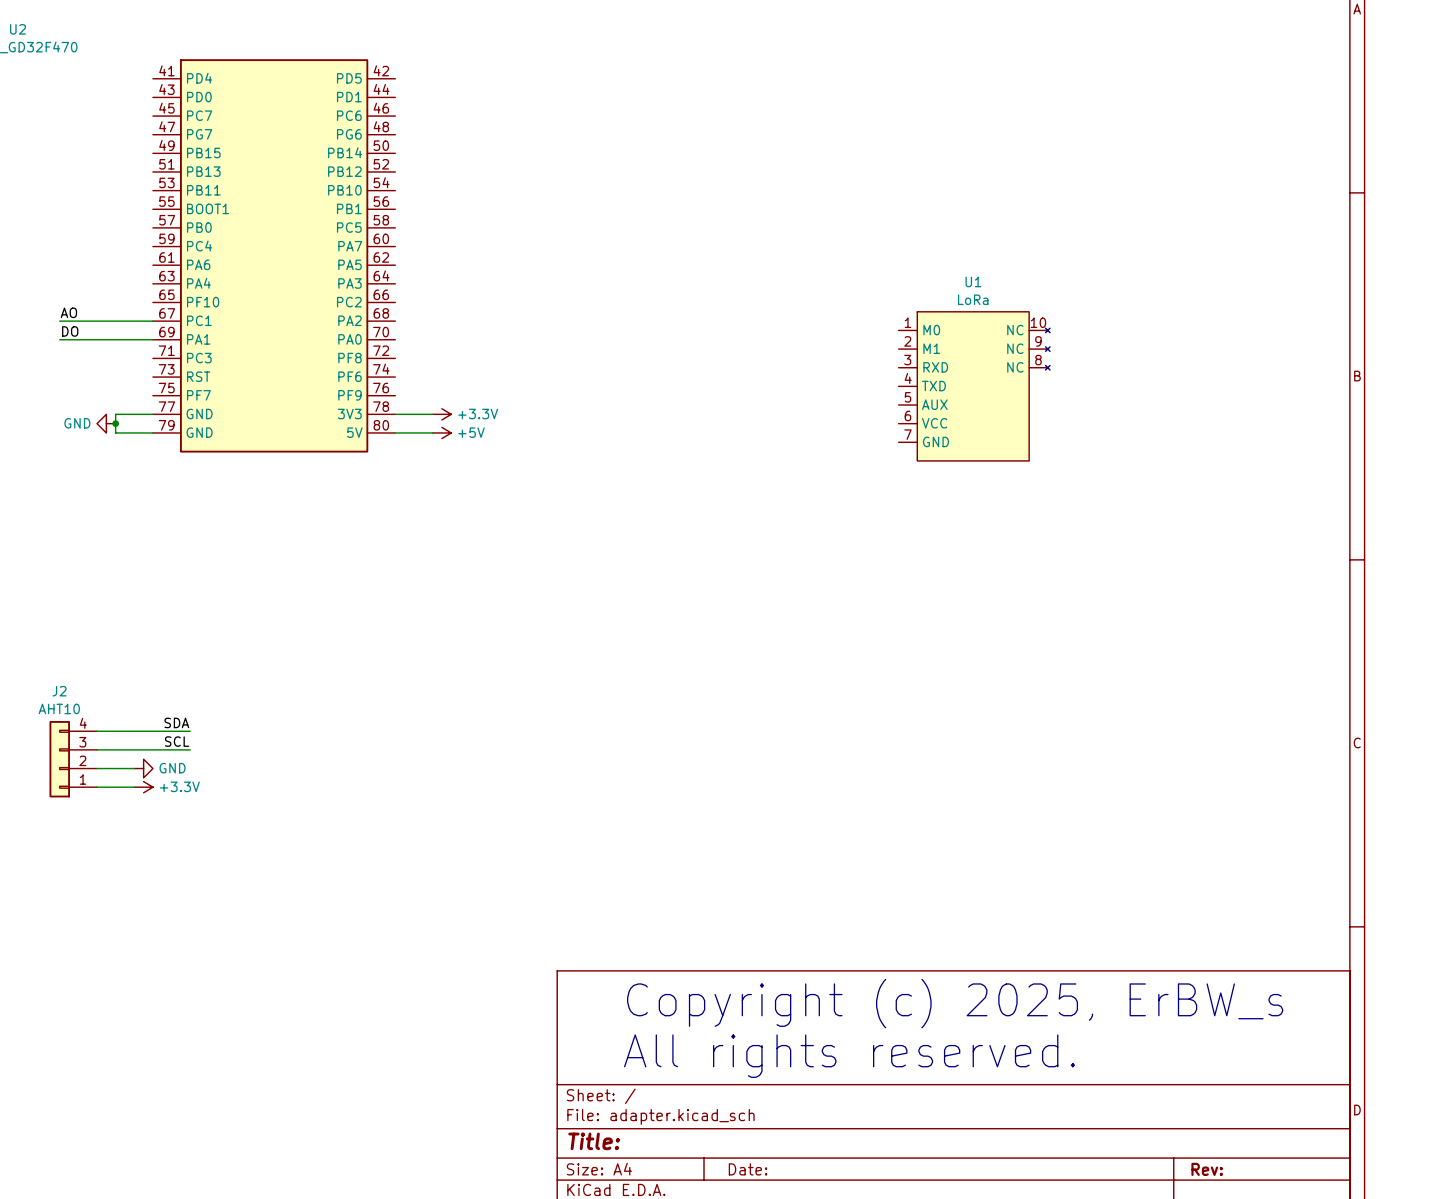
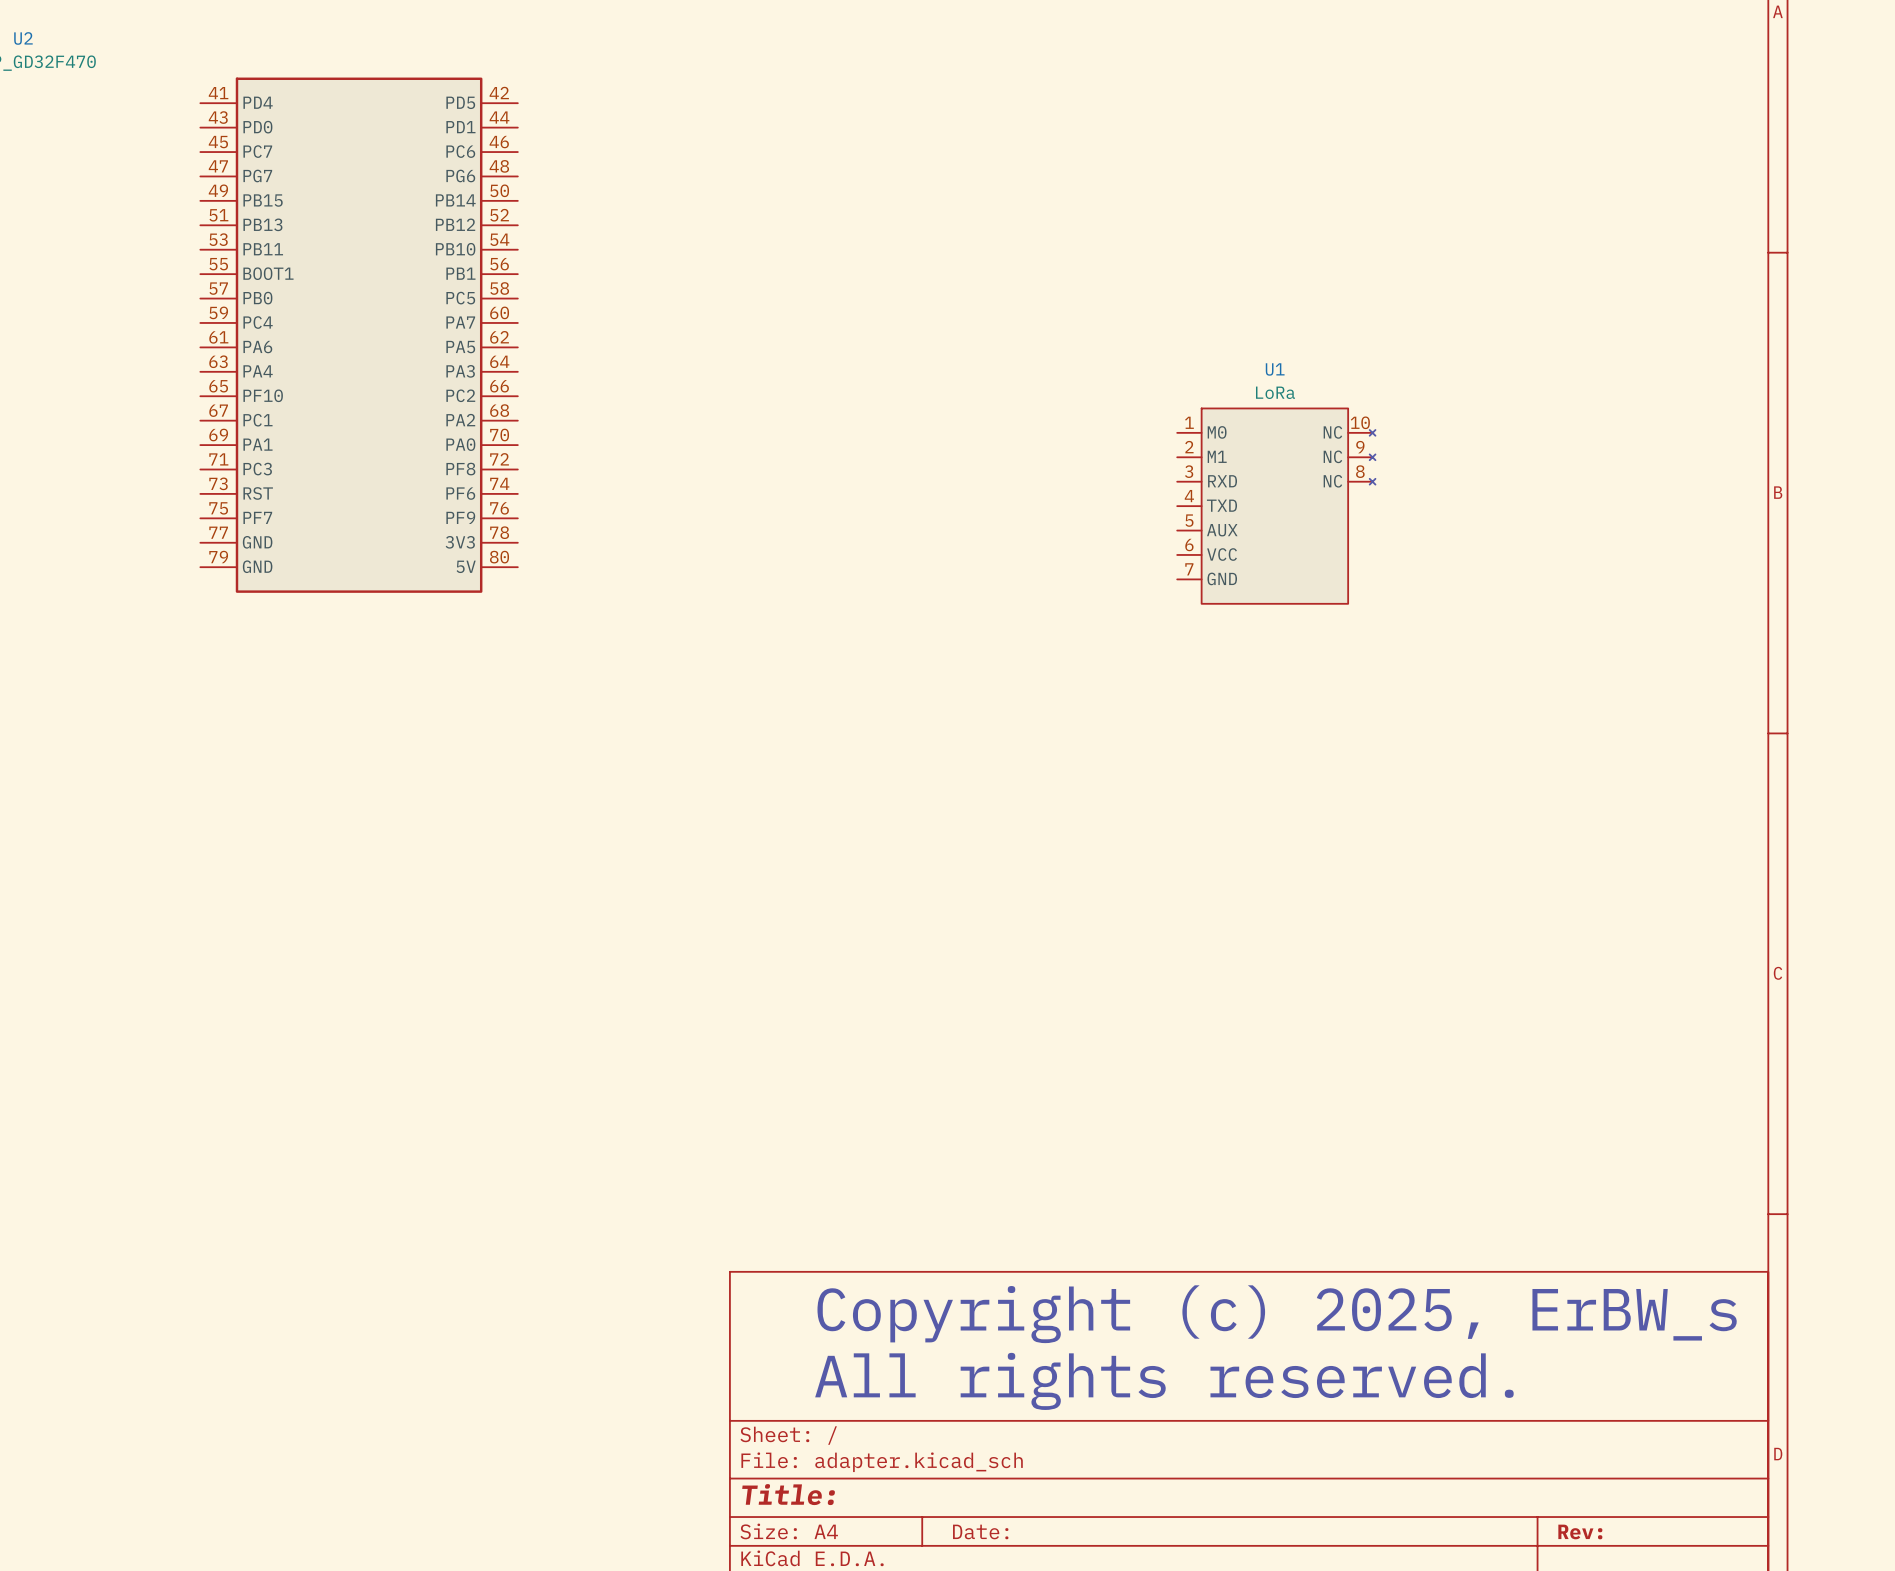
label: AO (68, 312) -> none
wire: (59, 321) (152, 321) -> none
label: DO (70, 331) -> none
wire: (59, 339) (152, 339) -> none
wire: (152, 414) (115, 414) (115, 432) (152, 432) -> none
wire: (395, 414) (432, 414) -> none
power symbol: +3.3V (441, 414) -> none
power symbol: GND (106, 423) -> none
junction: (115, 423) -> none
wire: (395, 432) (432, 432) -> none
power symbol: +5V (441, 432) -> none
label: SDA (176, 722) -> none
wire: (97, 731) (190, 731) -> none
label: SCL (177, 741) -> none
wire: (97, 749) (190, 749) -> none
J2: AHT10 (73, 759) -> none
wire: (97, 768) (134, 768) -> none
power symbol: GND (143, 768) -> none
wire: (97, 787) (134, 787) -> none
power symbol: +3.3V (143, 787) -> none

